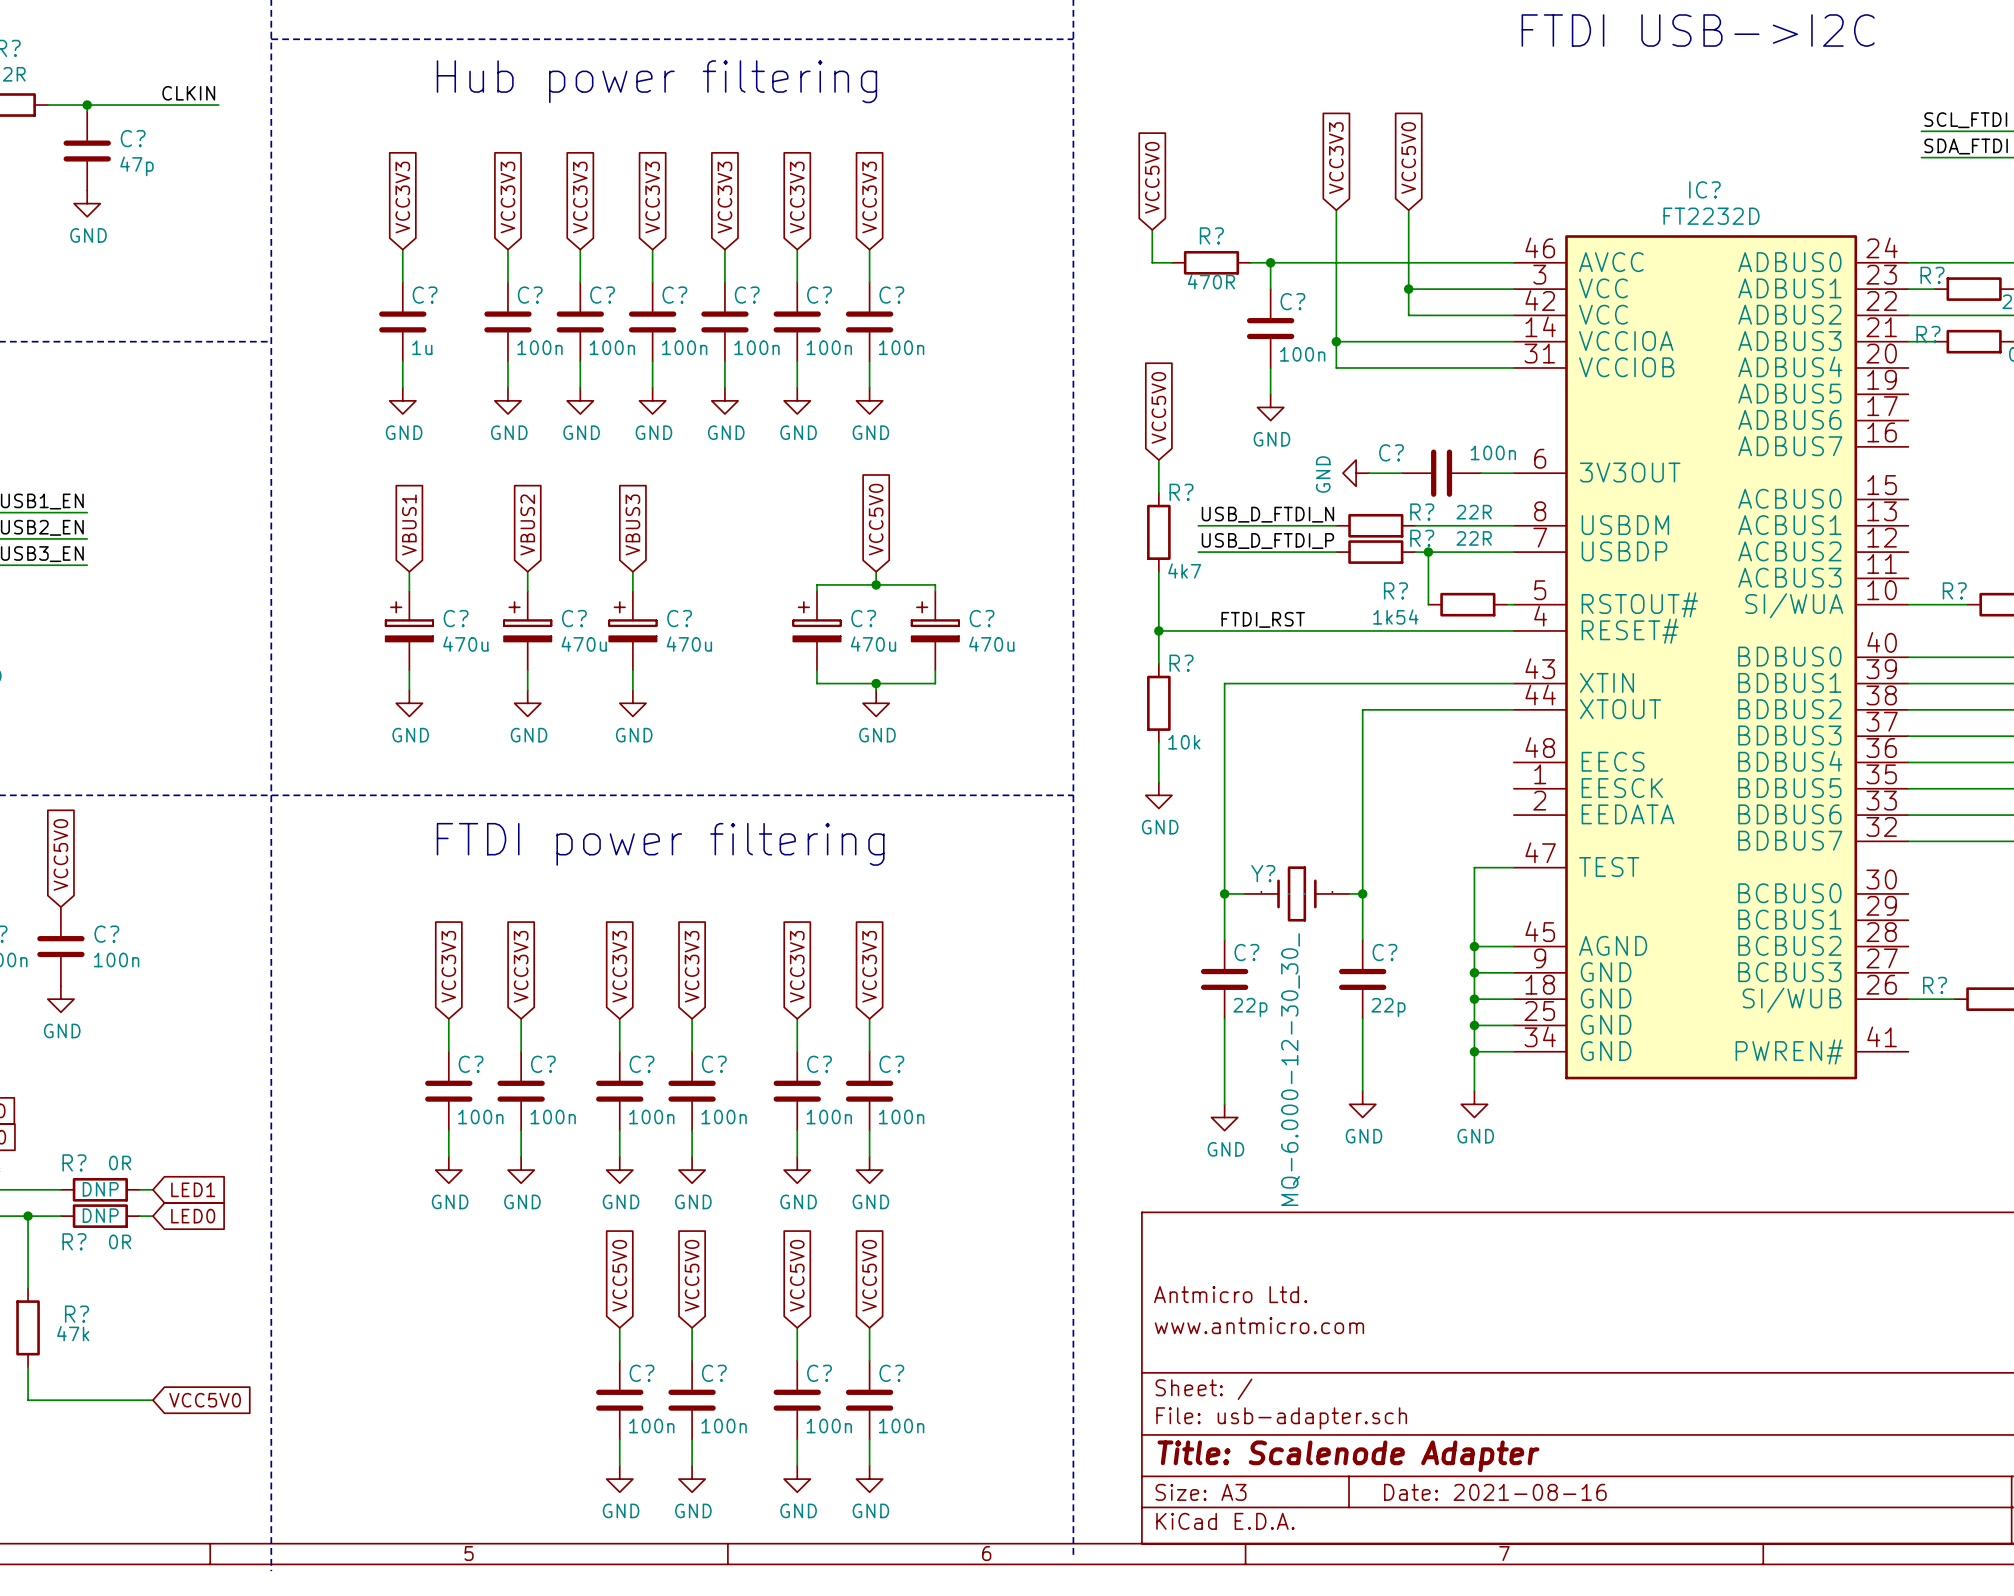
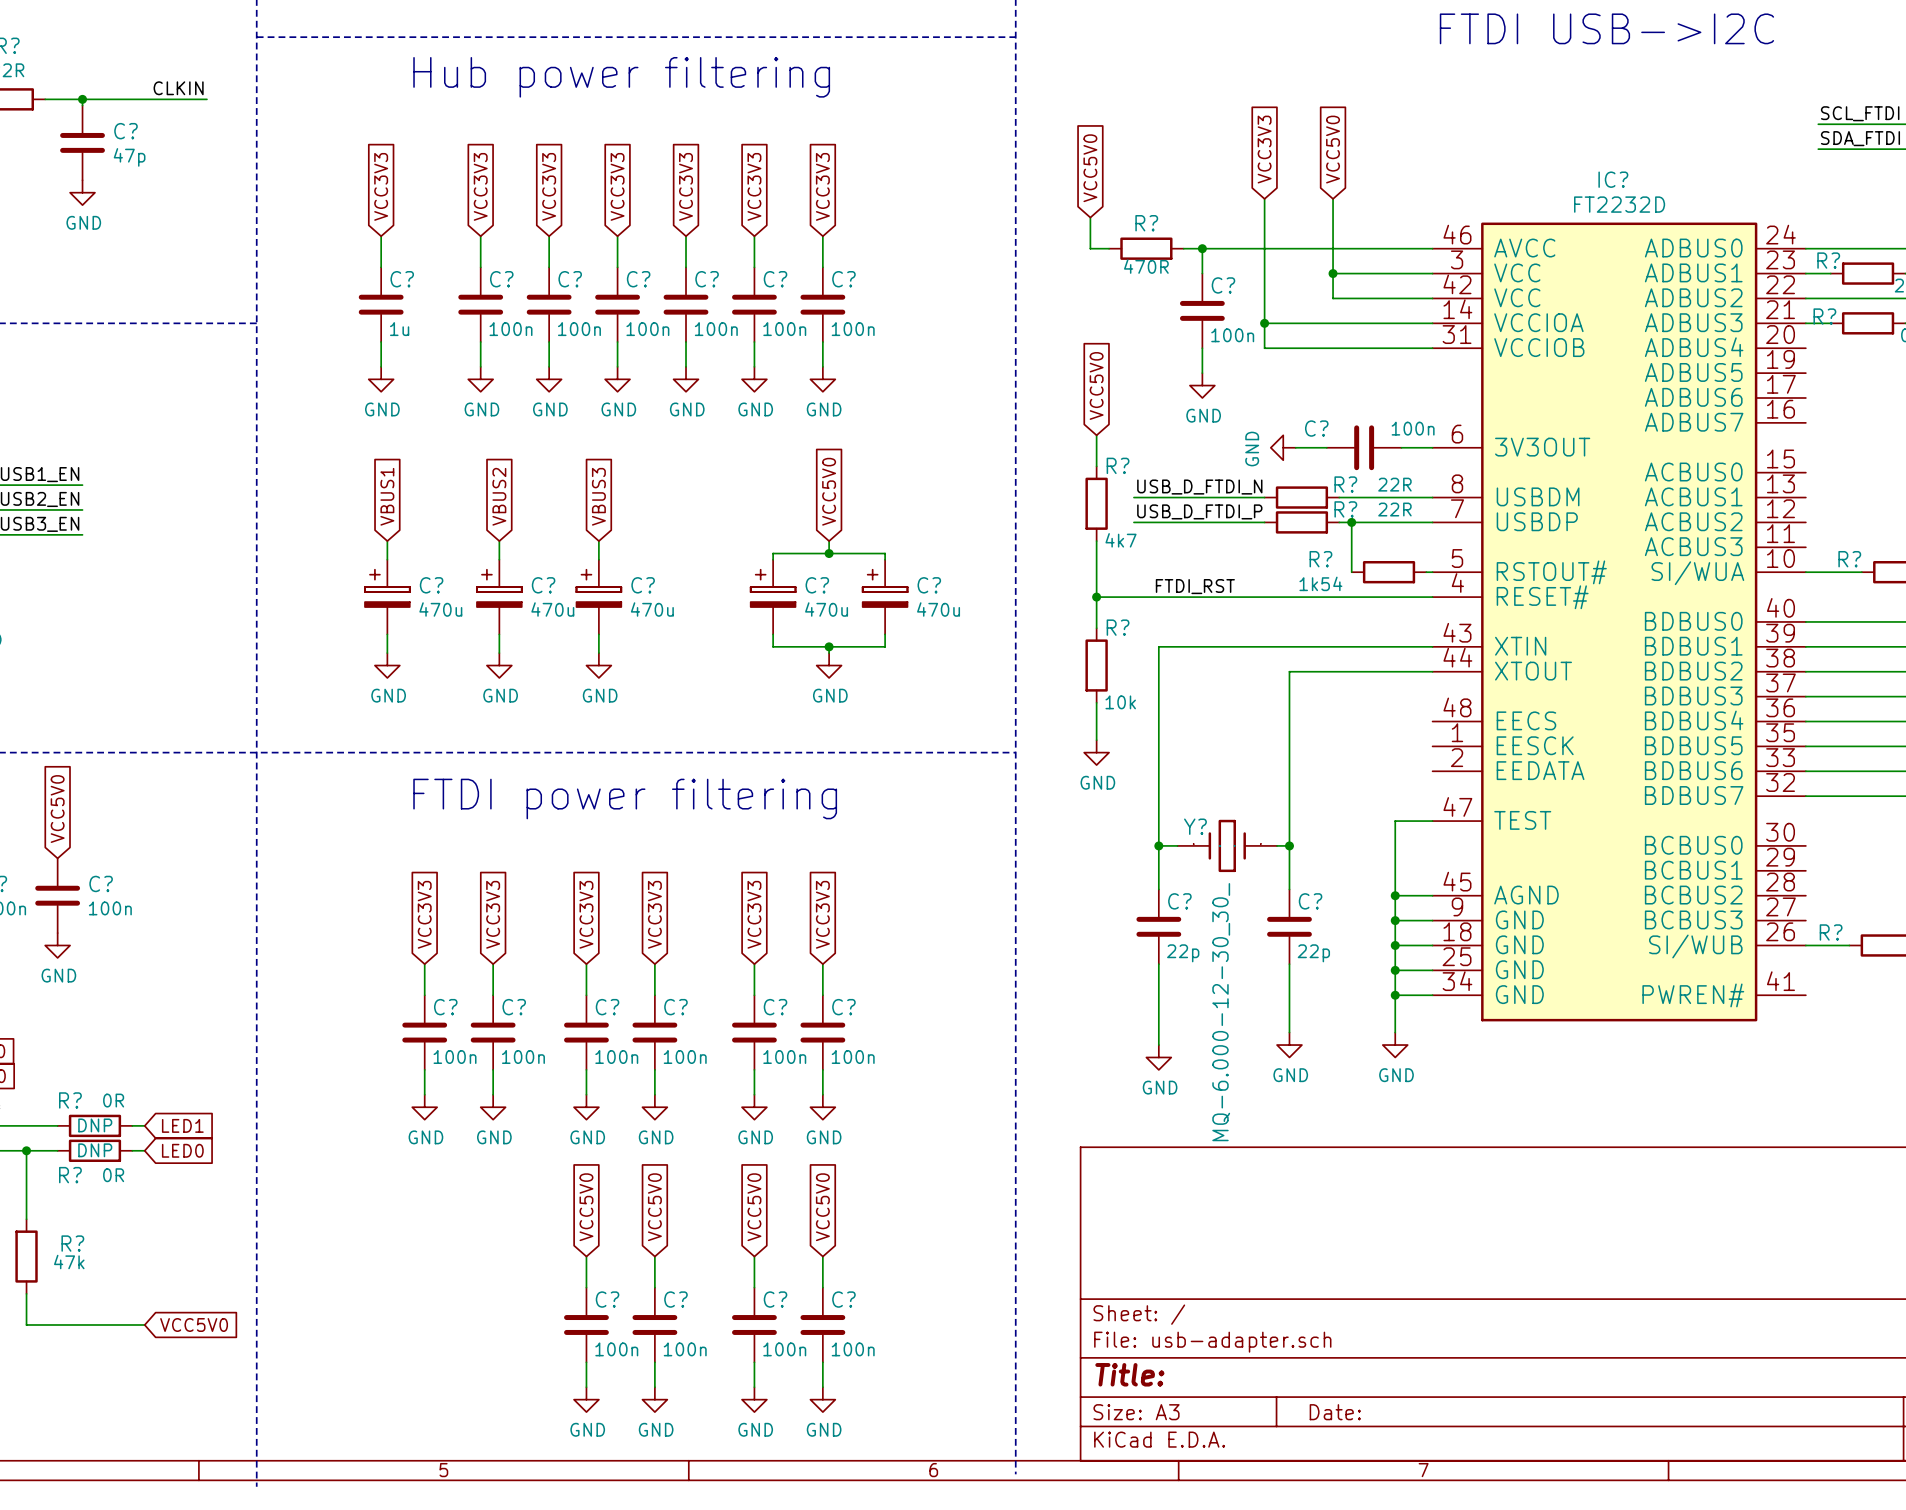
title block: Antmicro Ltd. (1230, 1294) -> none
title block: www.antmicro.com (1259, 1325) -> none
title block: Title: Scalenode Adapter (1348, 1456) -> Title: (1129, 1374)
title block: Date: 2021-08-16 (1495, 1492) -> Date: (1335, 1412)

